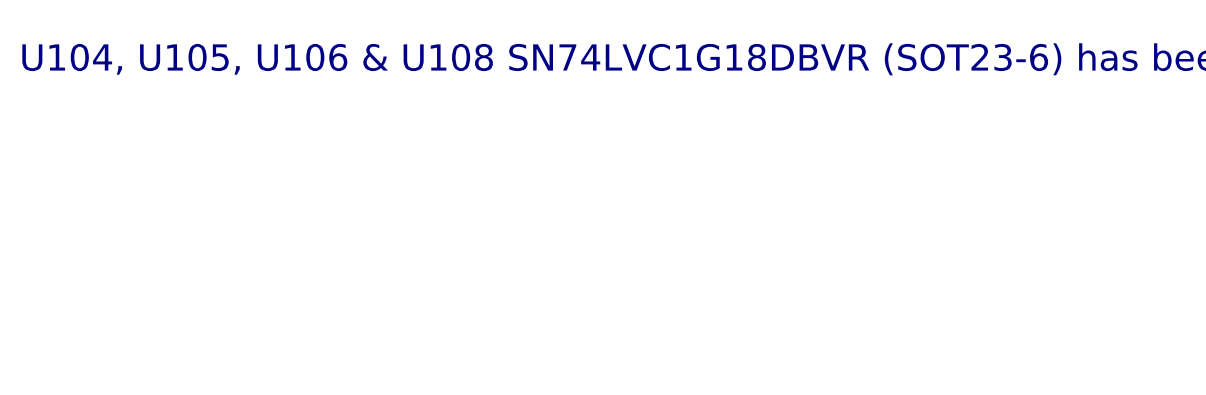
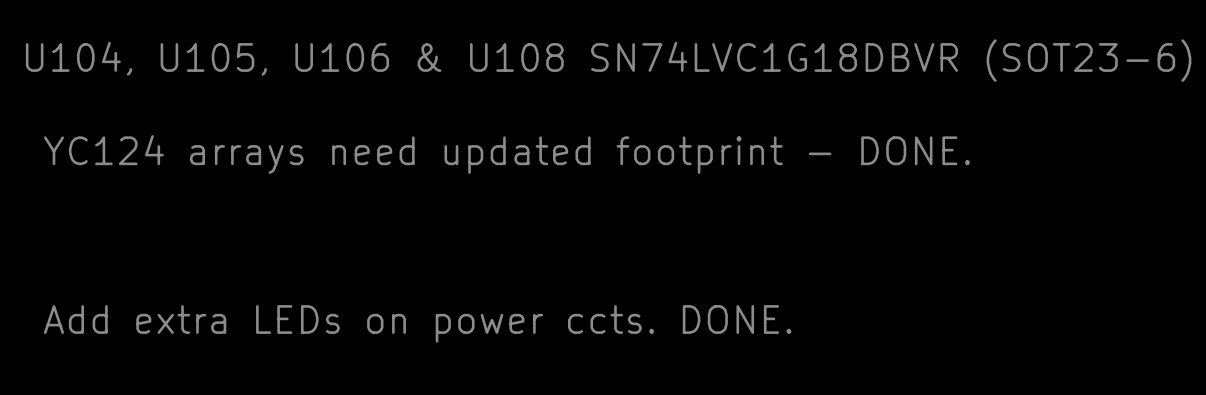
text: none -> YC124 arrays need updated footprint - DONE. (506, 154)
text: none -> Add extra LEDs on power ccts. DONE. (417, 323)

